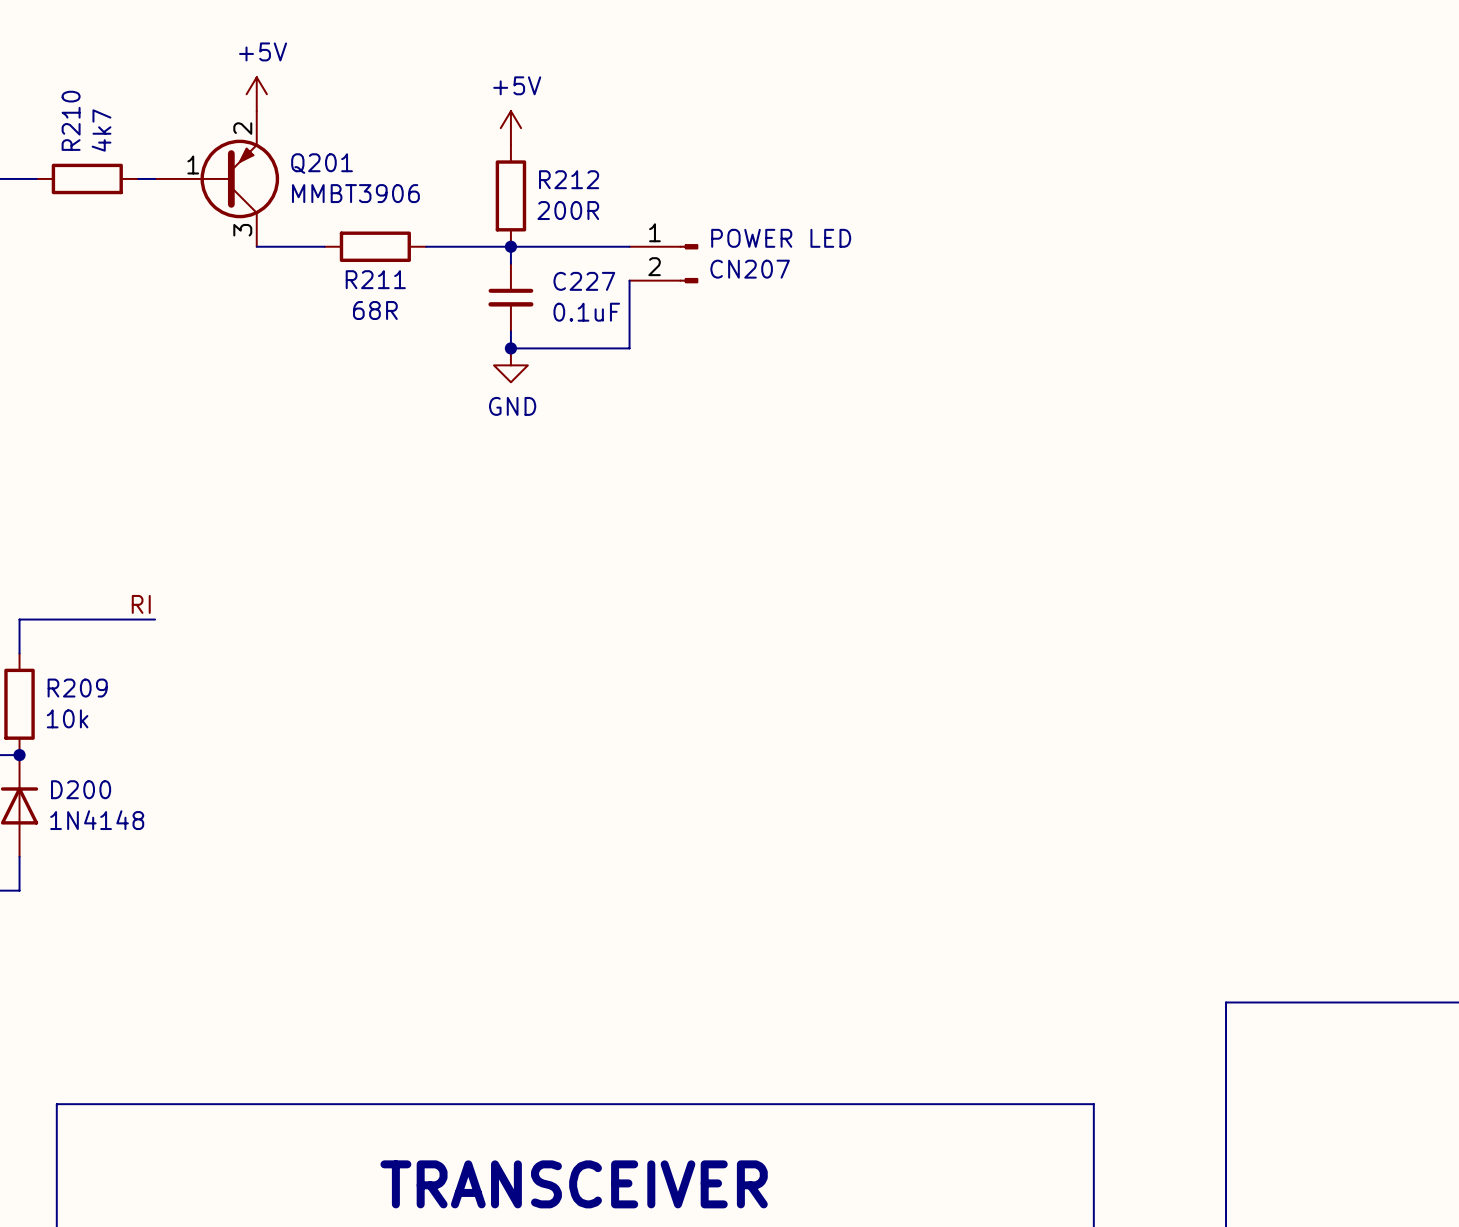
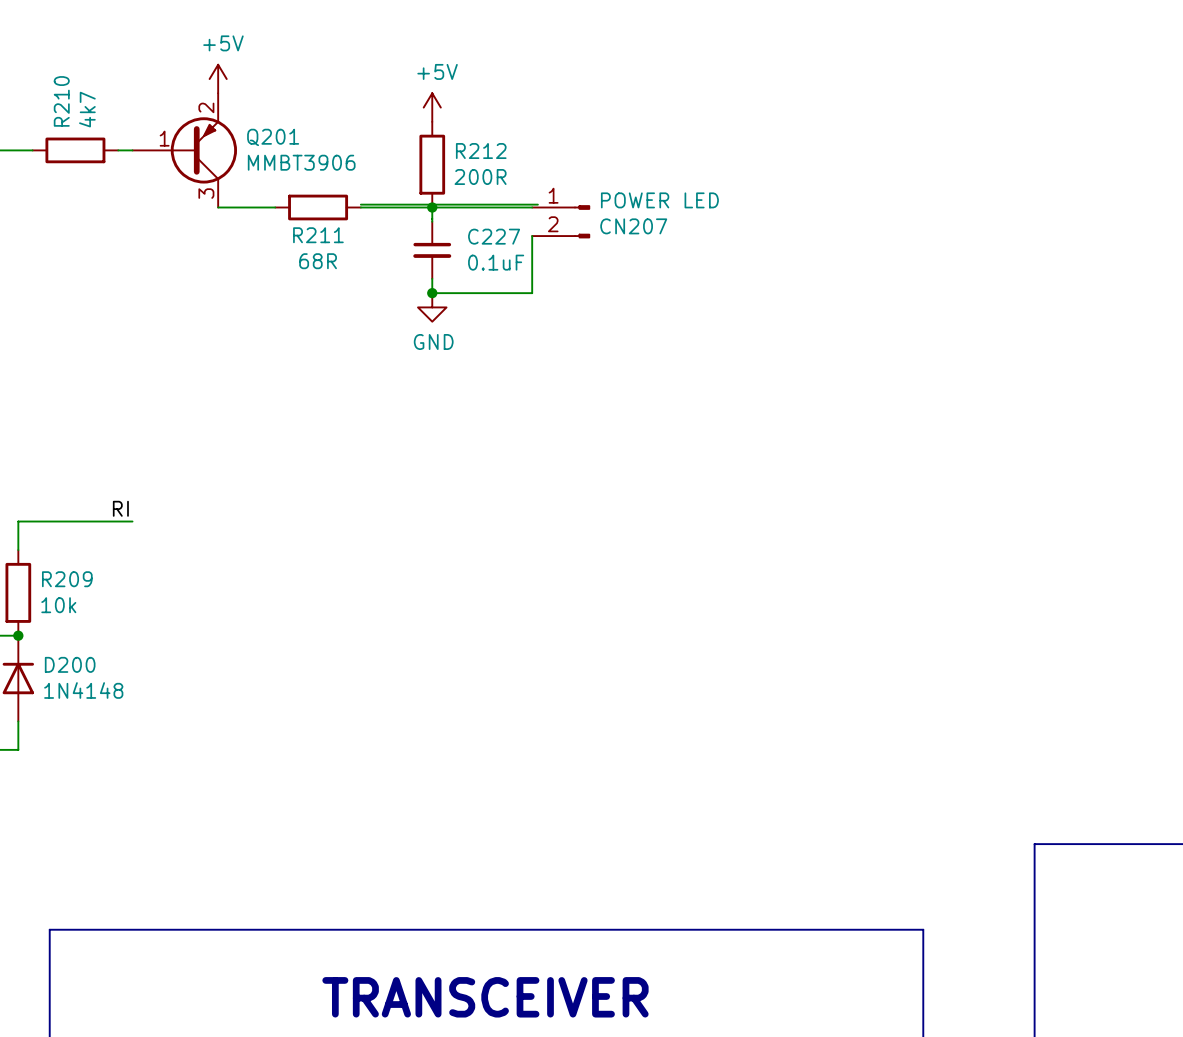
wire: none -> (360, 204) (537, 204)

